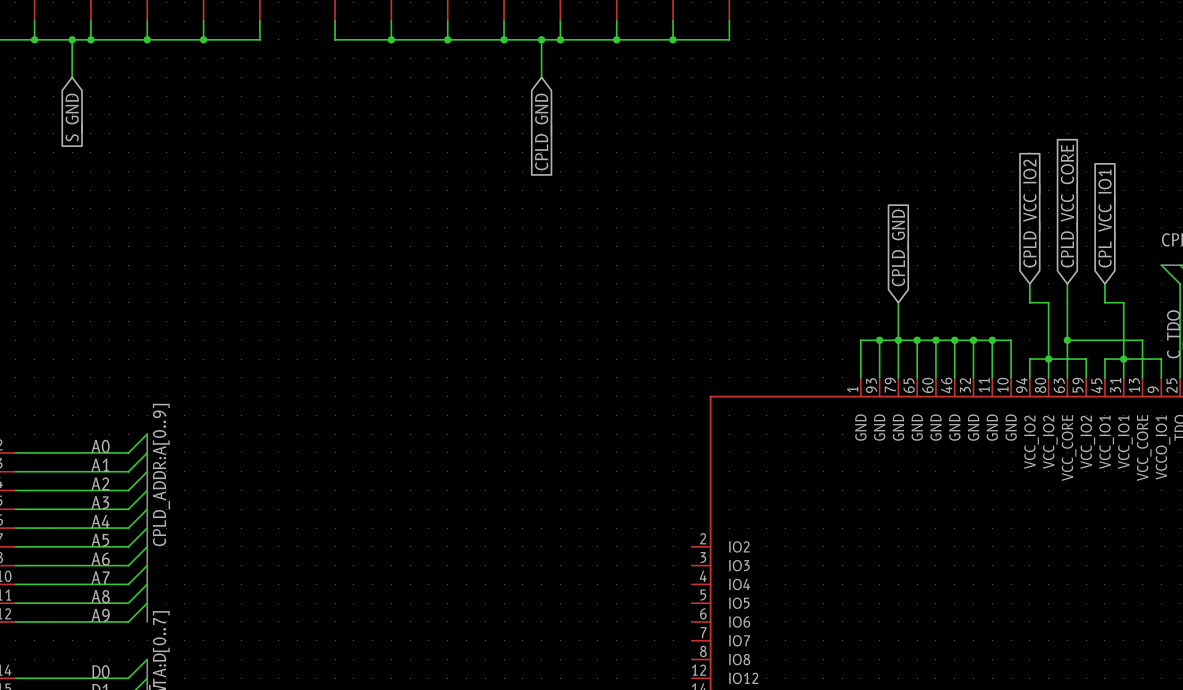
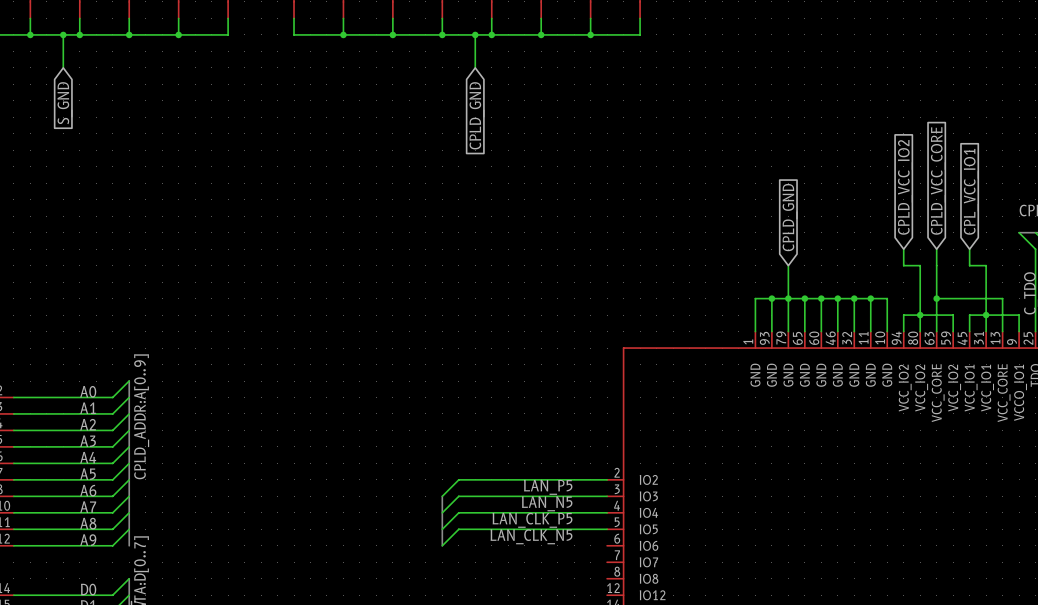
wire: none -> (607, 479) (458, 479) (442, 496)
label: none -> LAN_P5 (548, 487)
bus: none -> (442, 496) (442, 545)
wire: none -> (607, 496) (458, 496) (442, 512)
label: none -> LAN_N5 (547, 503)
wire: none -> (607, 512) (458, 512) (442, 529)
label: none -> LAN_CLK_P5 (532, 520)
wire: none -> (607, 529) (458, 529) (442, 545)
label: none -> LAN_CLK_N5 (531, 536)

